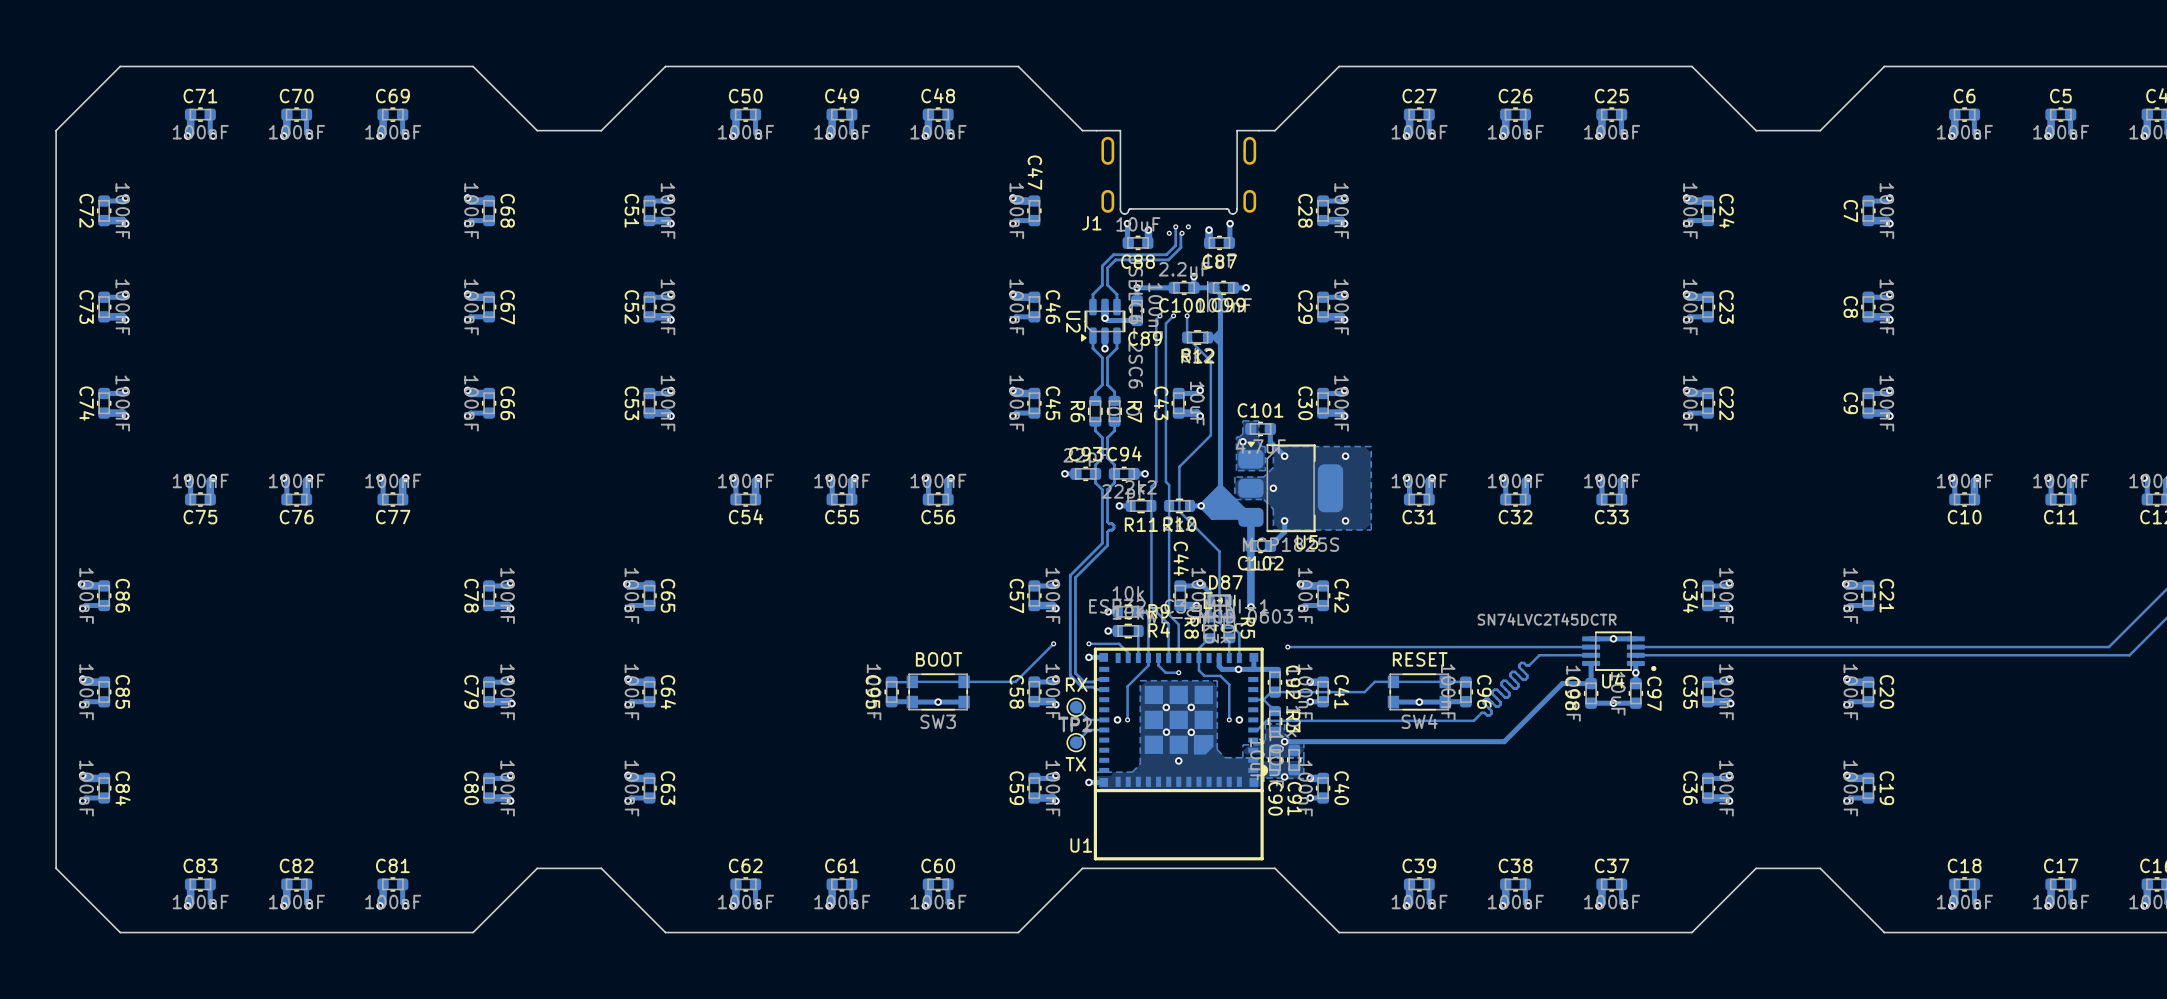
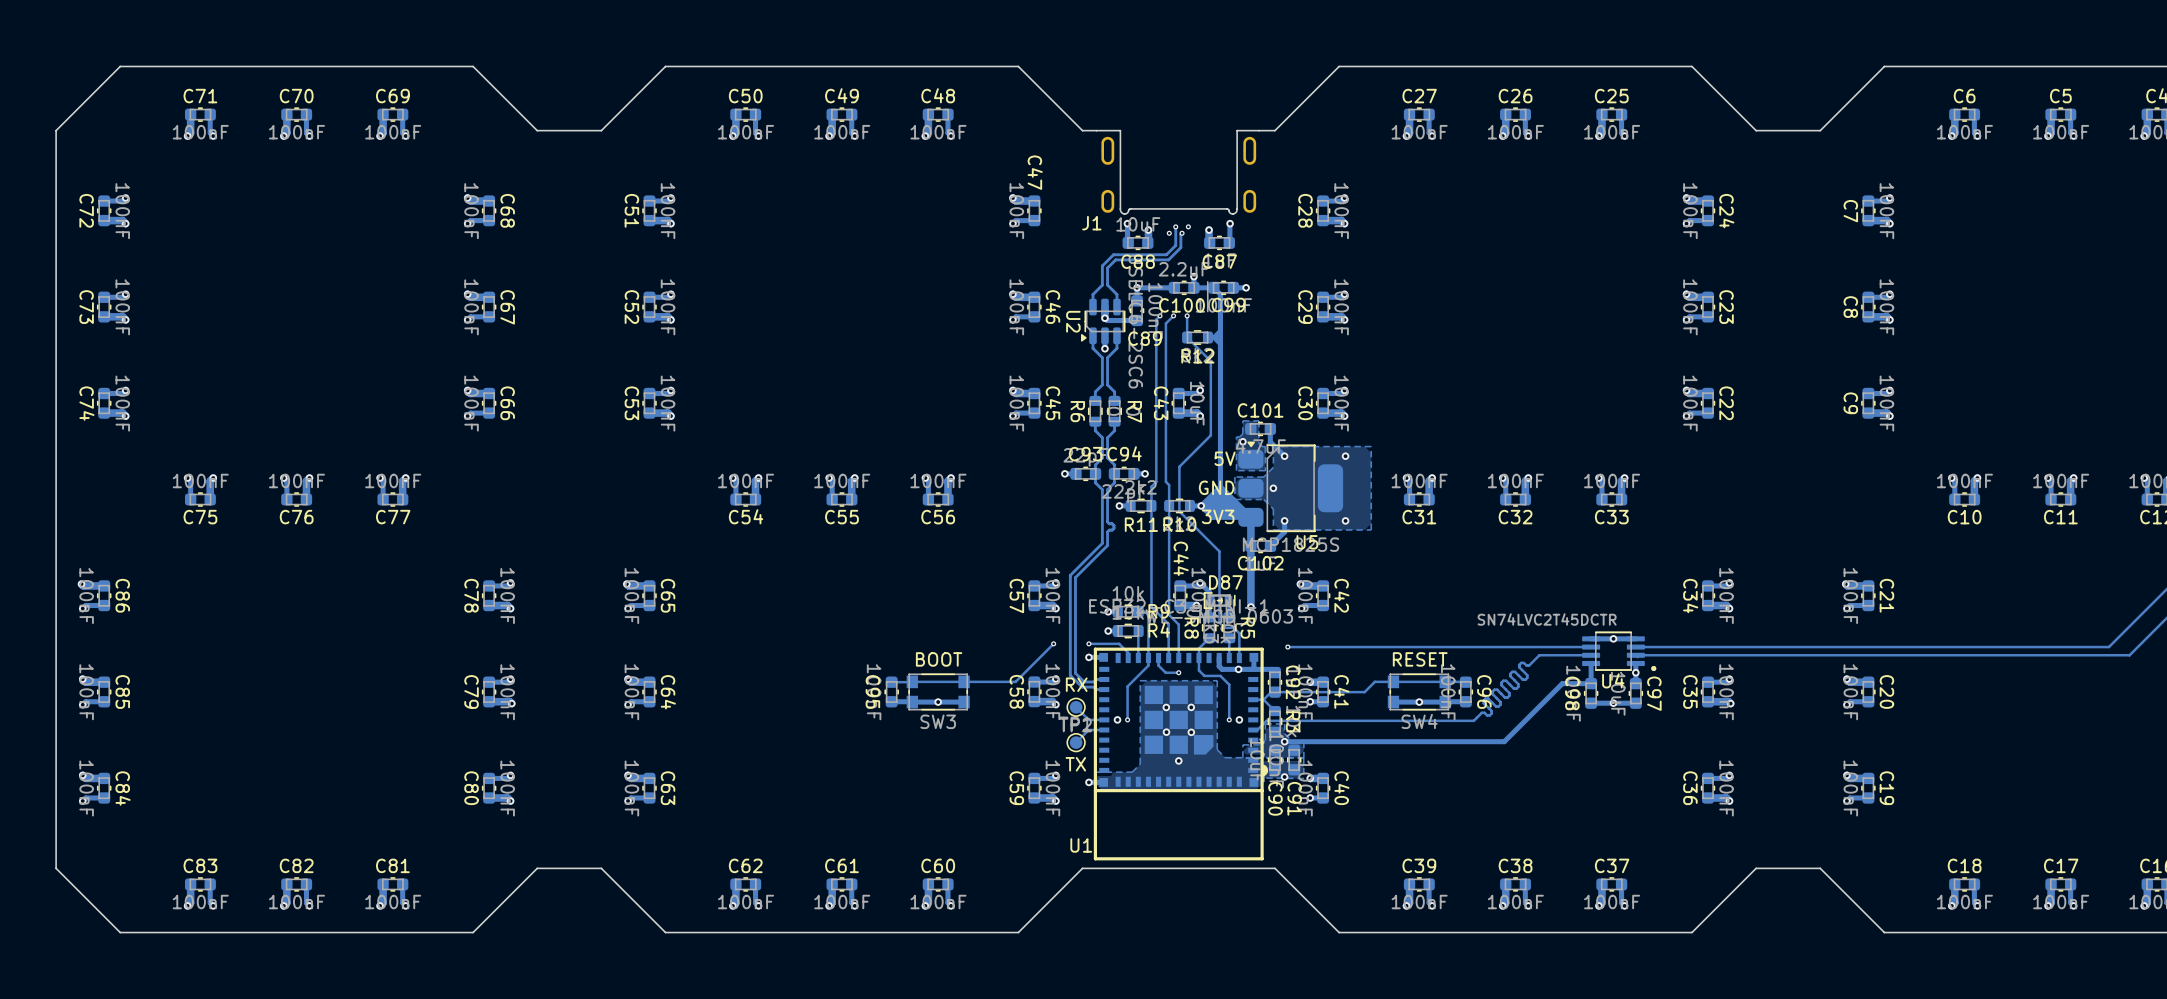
text: none -> 5V (1225, 458)
text: none -> GND (1216, 487)
text: none -> 3V3 (1218, 516)

